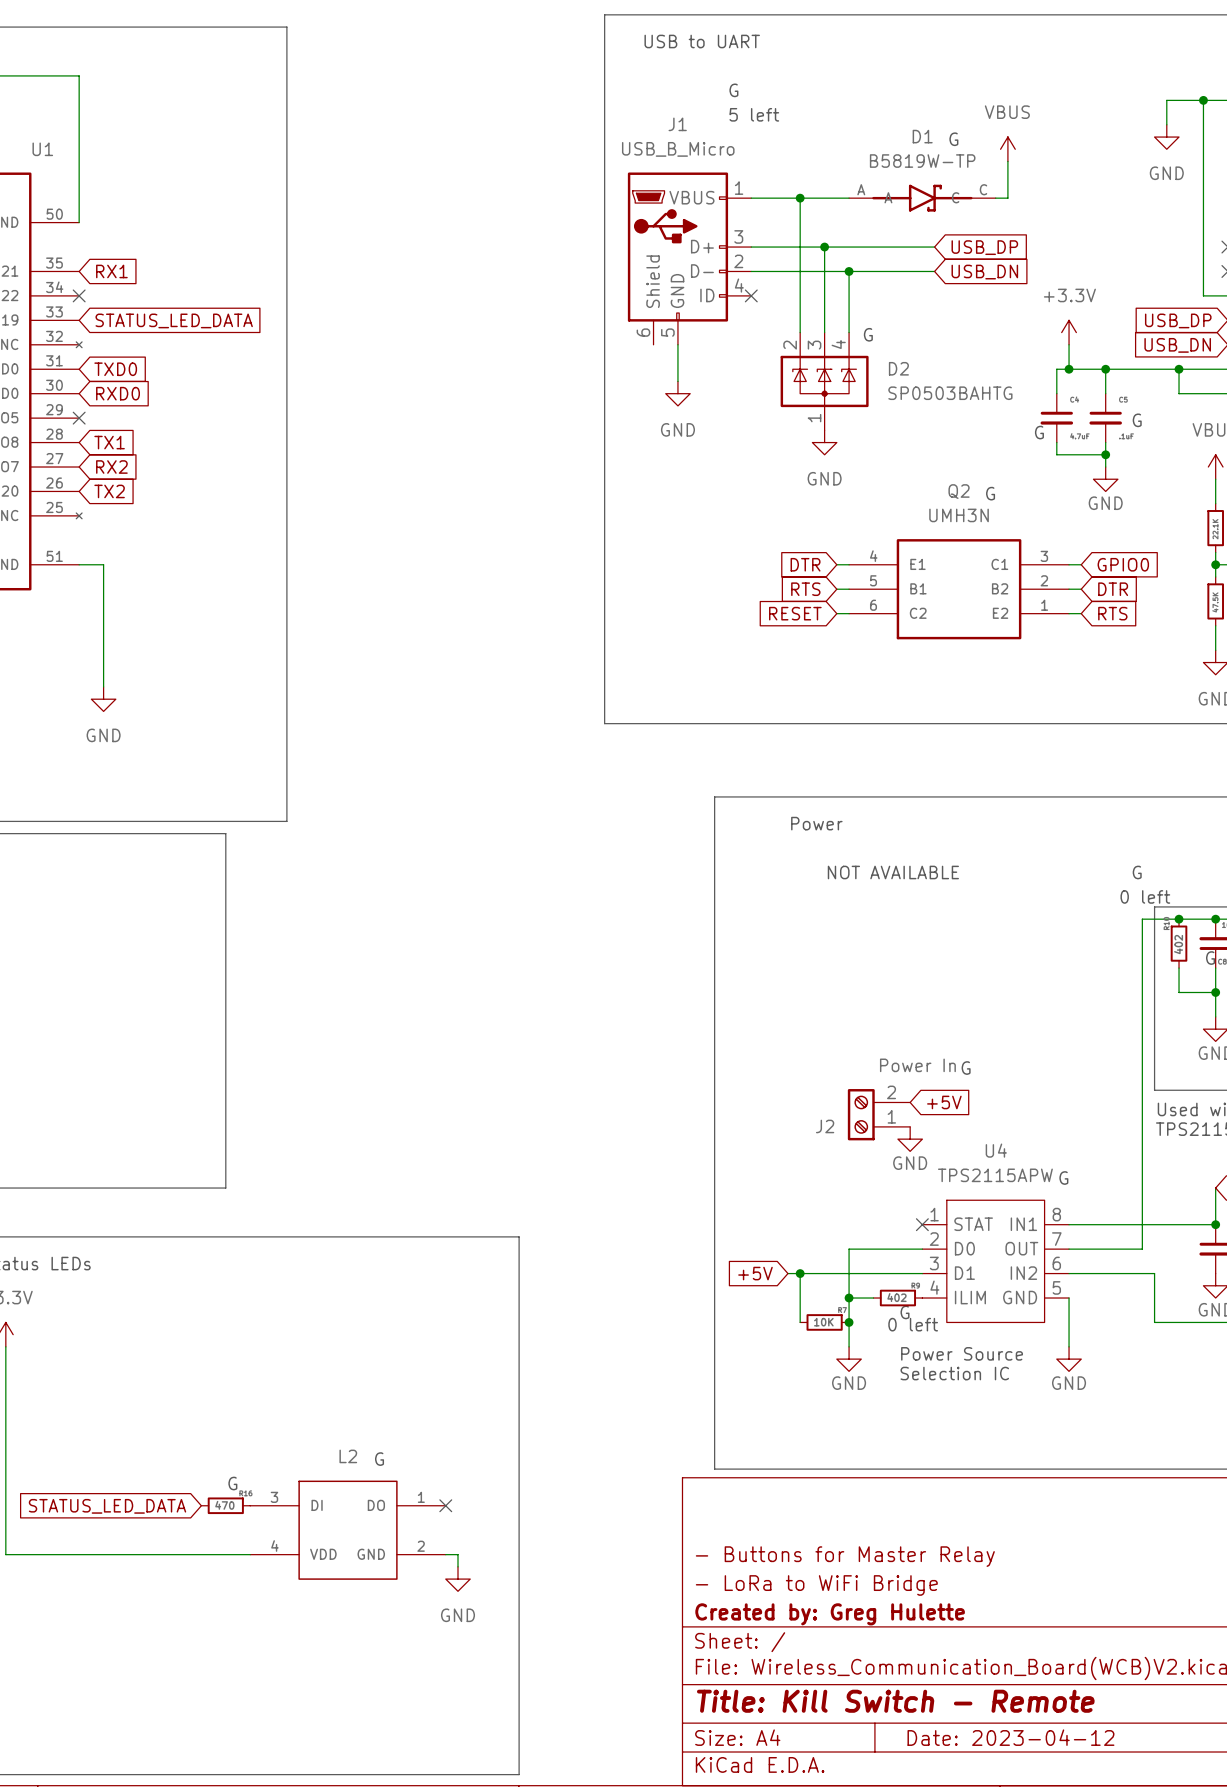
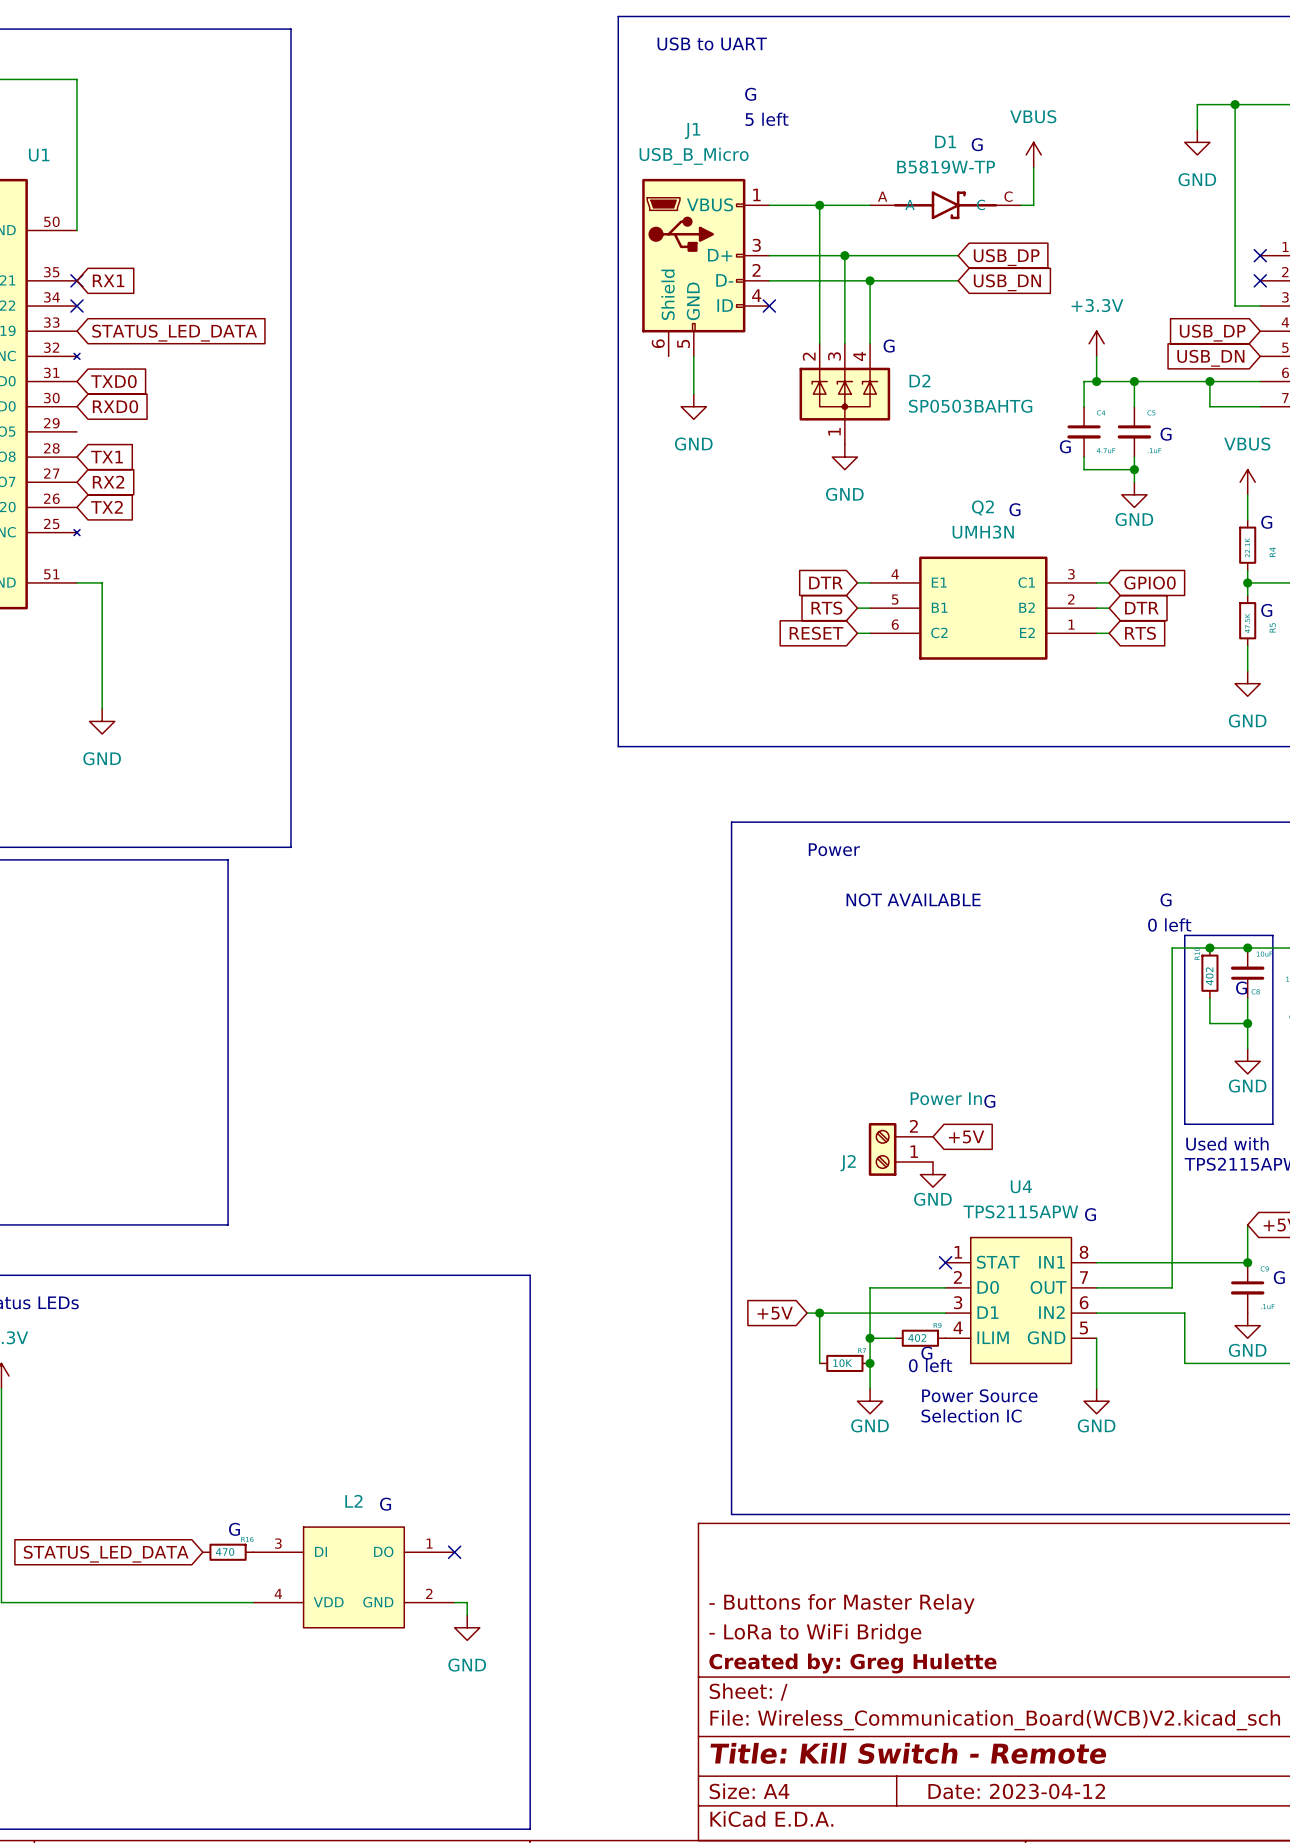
no-connect mark: none -> (76, 280)
no-connect mark: (79, 418) -> none

